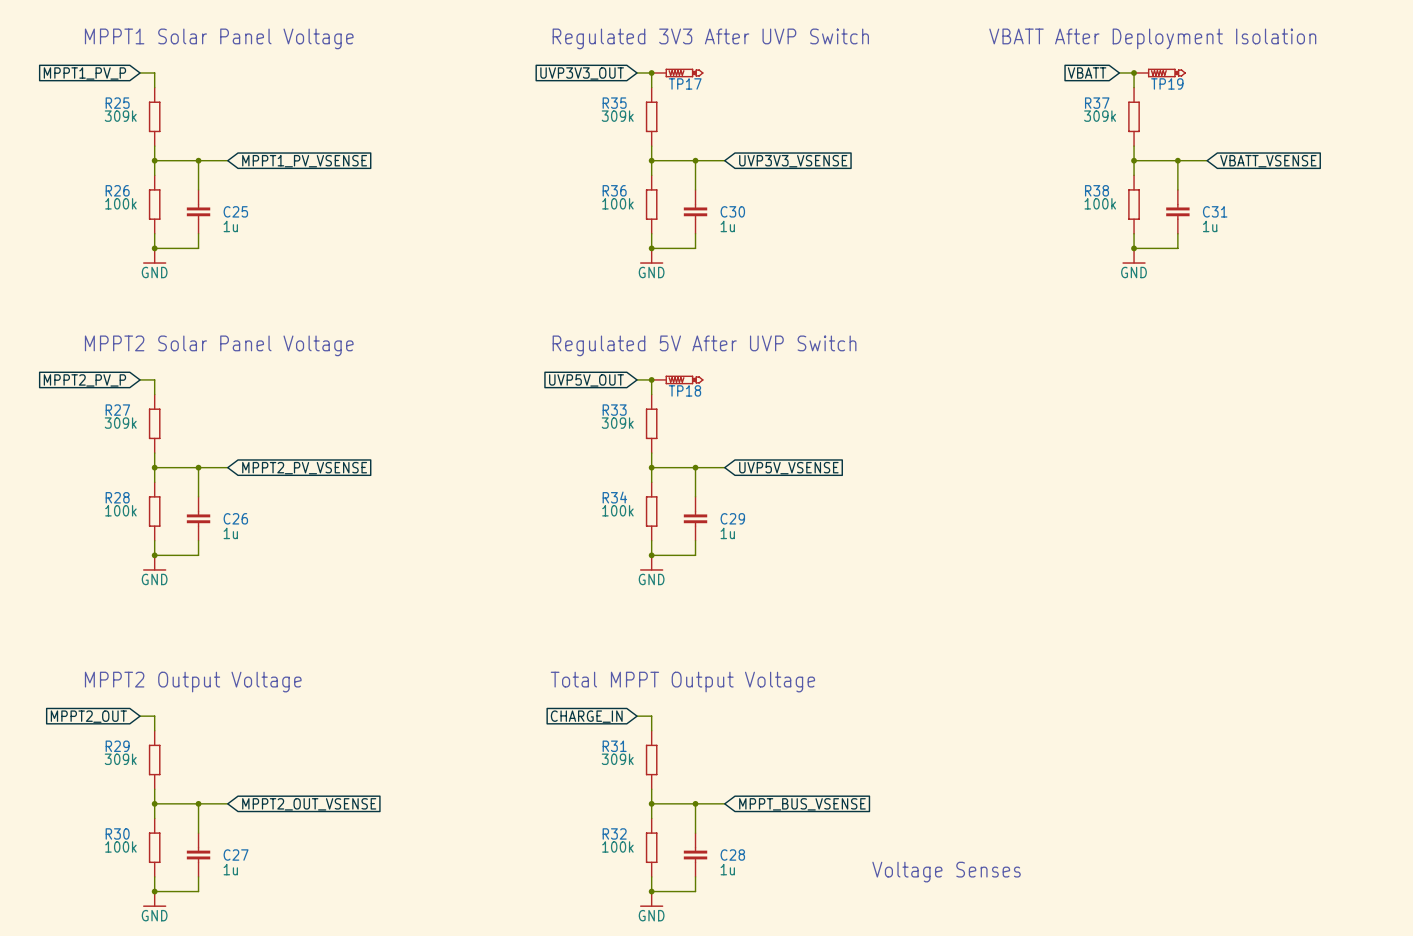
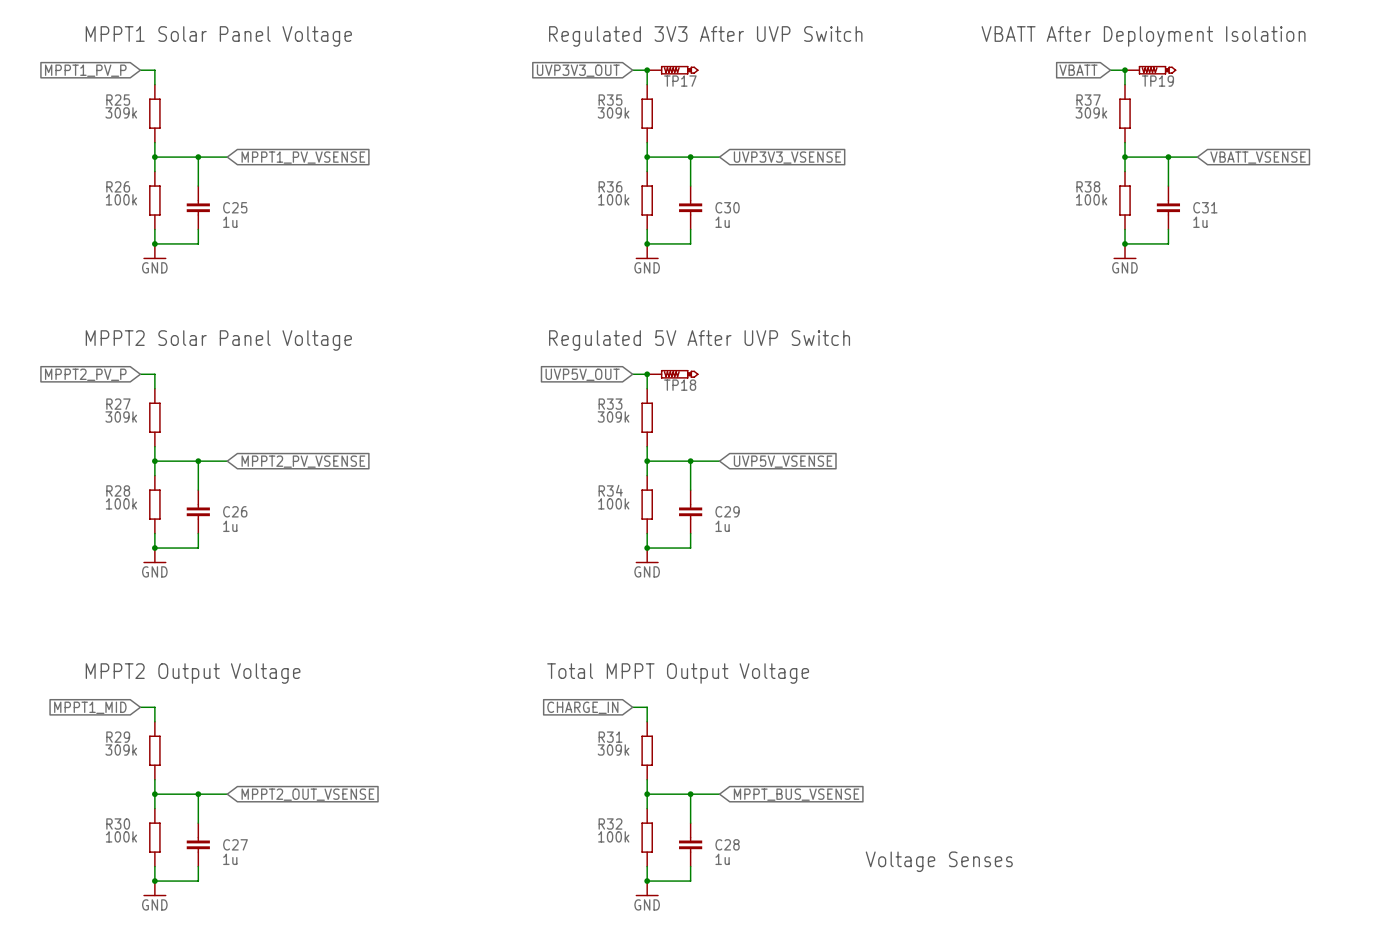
global label: MPPT2_OUT (88, 716) -> MPPT1_MID (90, 707)

